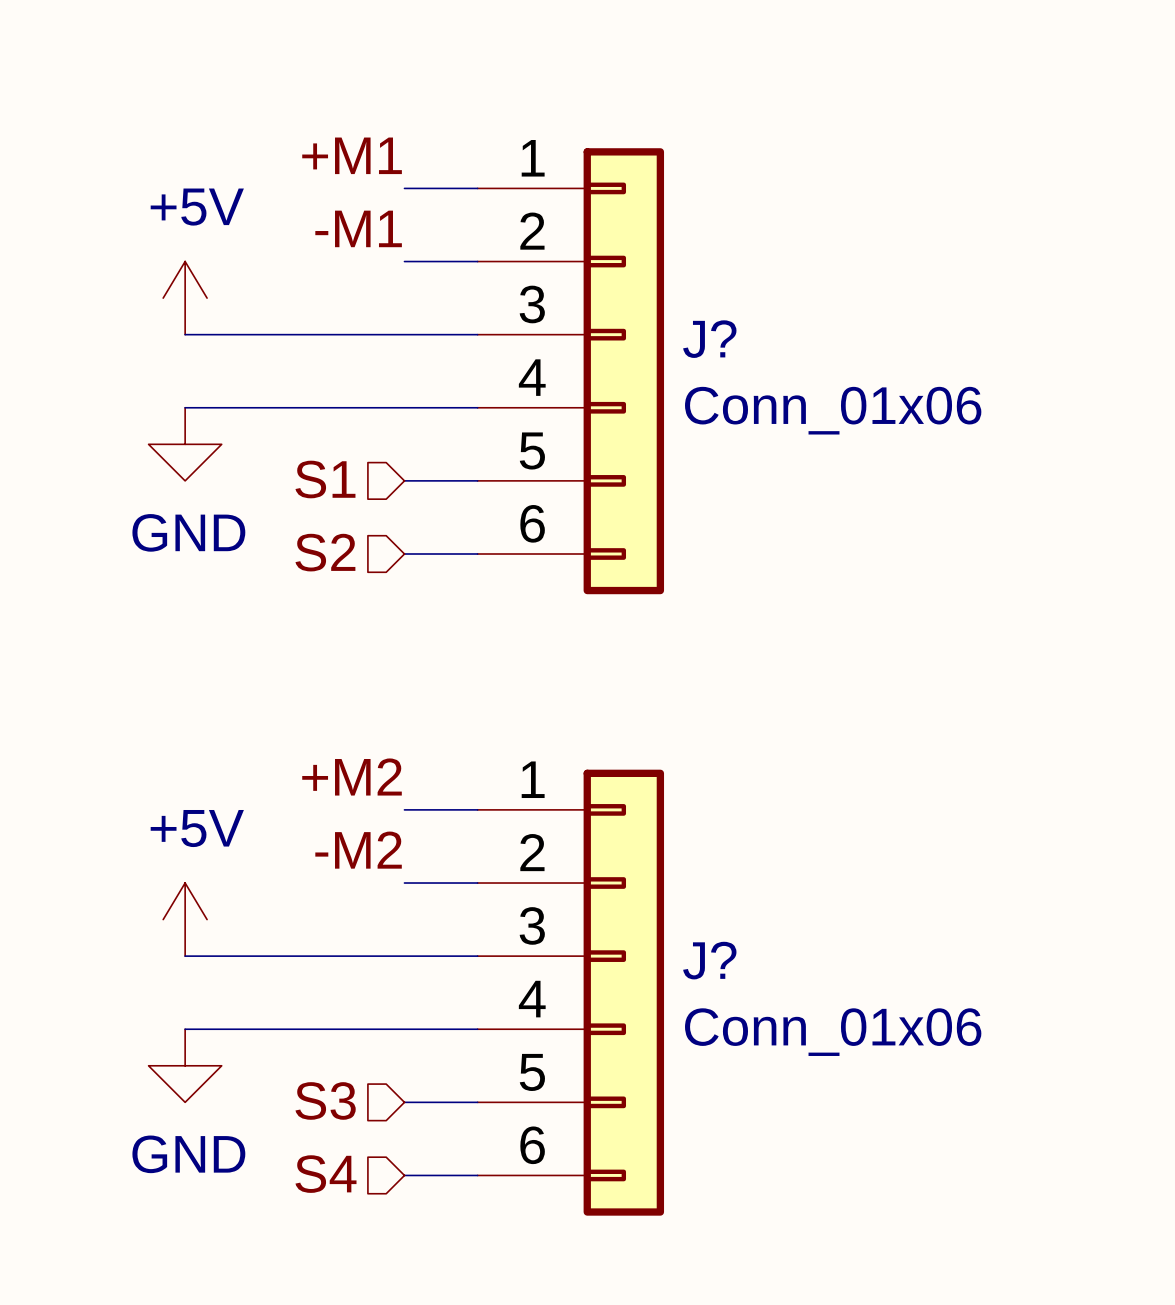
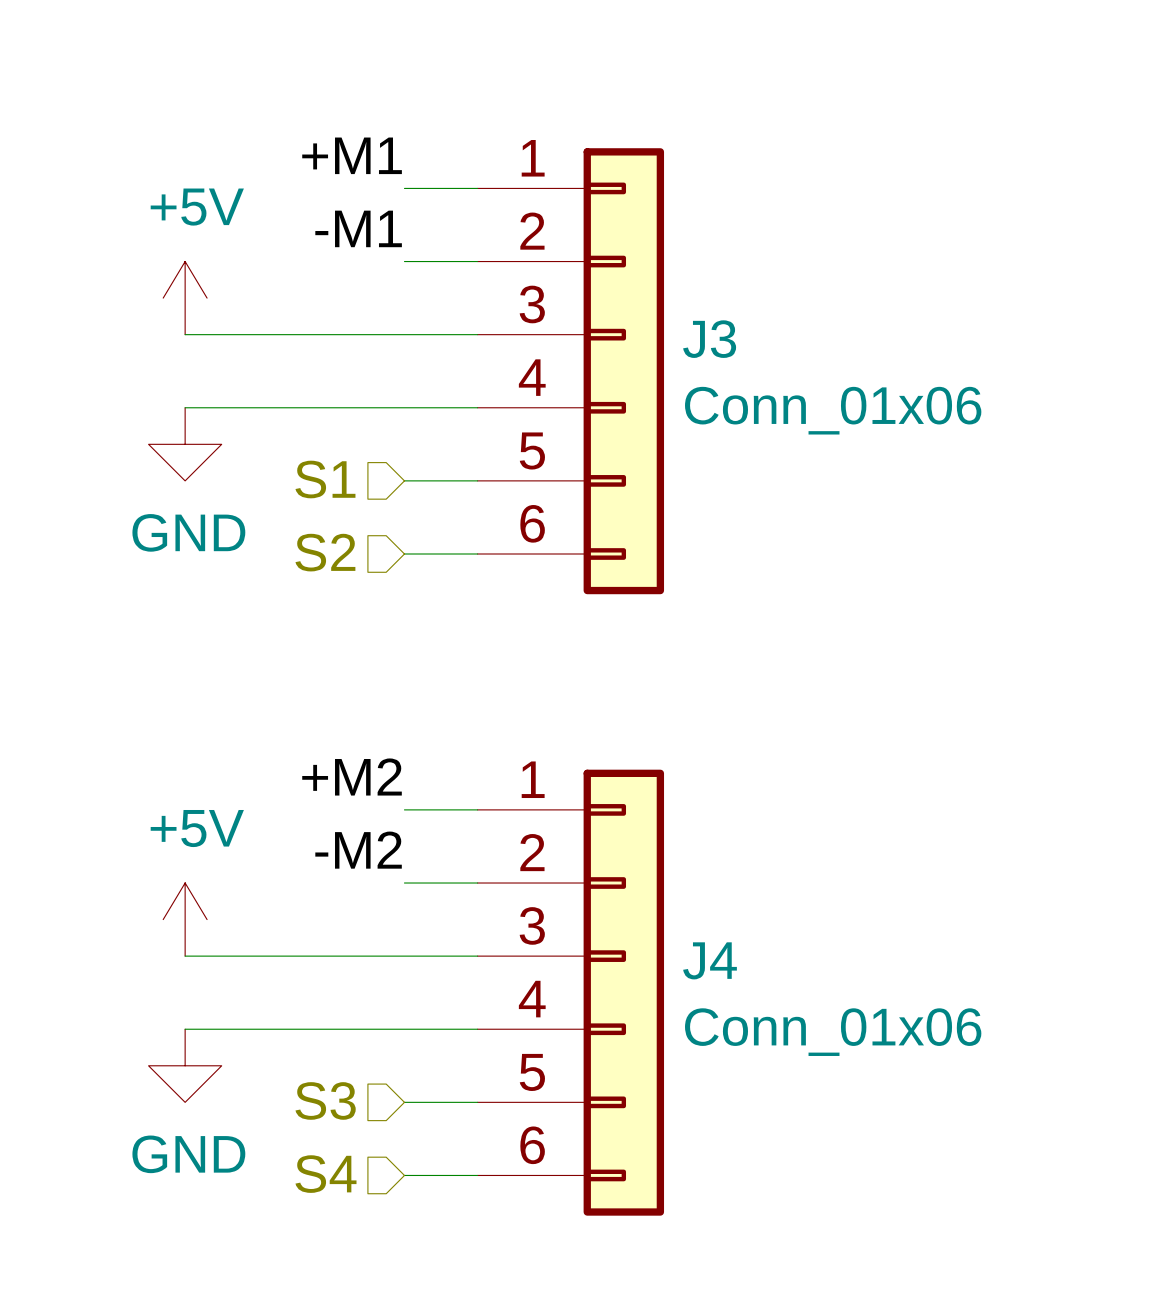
J? name: J? (709, 339) -> J3 (709, 339)
J? name: J? (709, 960) -> J4 (710, 960)

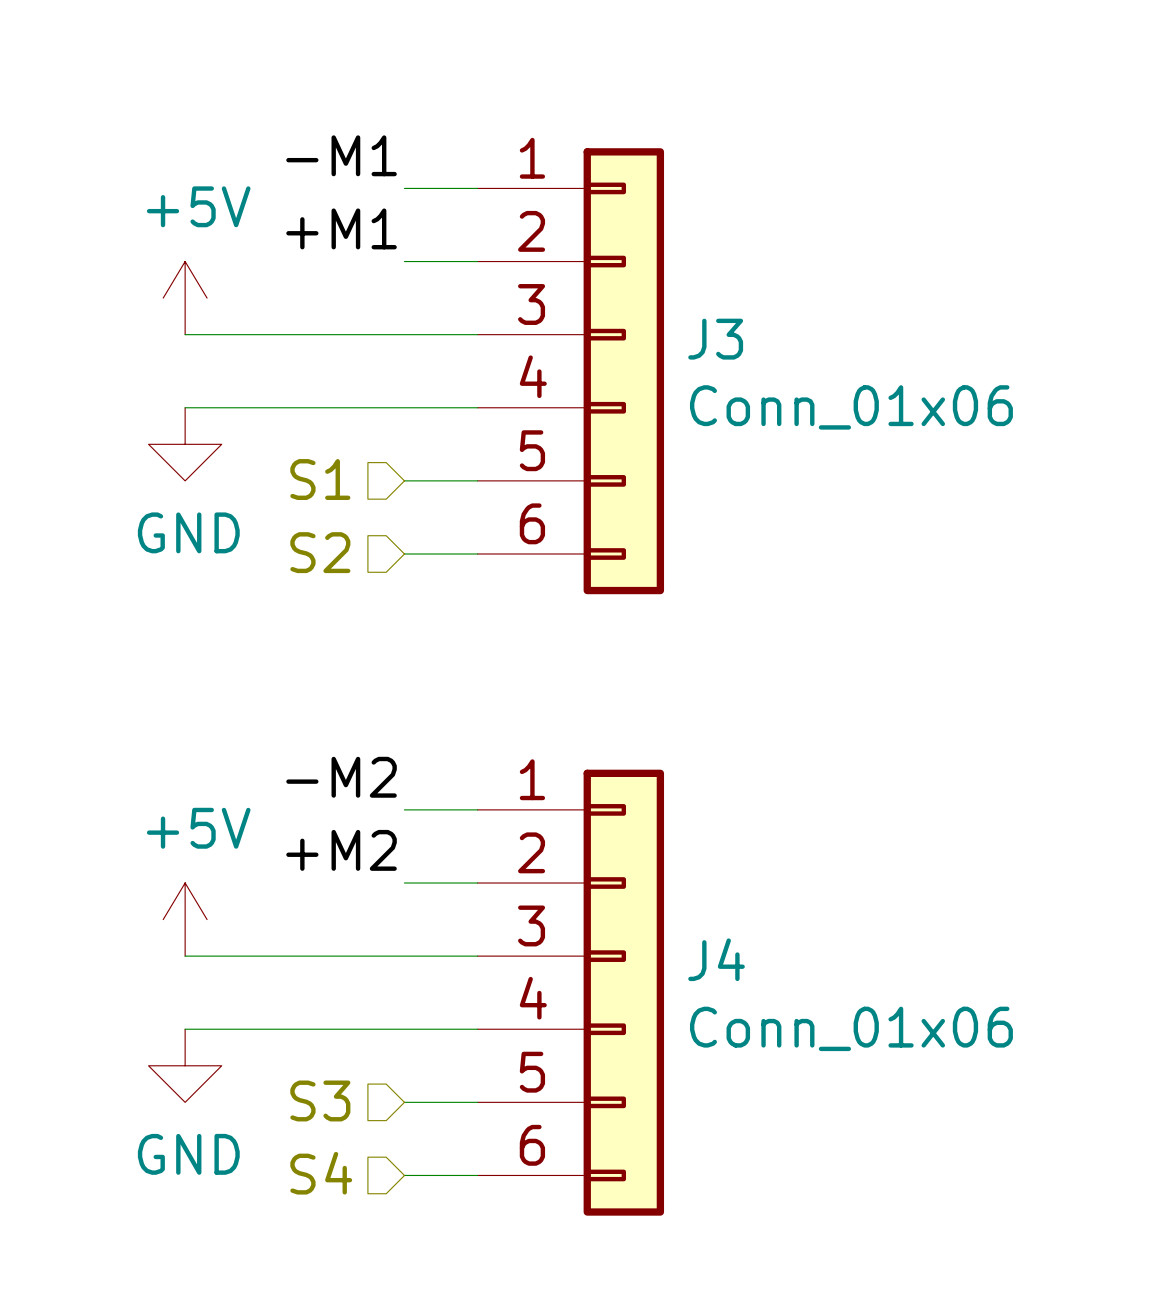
label: +M1 (352, 155) -> -M1 (341, 155)
label: -M1 (358, 228) -> +M1 (341, 228)
label: +M2 (352, 776) -> -M2 (341, 777)
label: -M2 (358, 850) -> +M2 (341, 850)

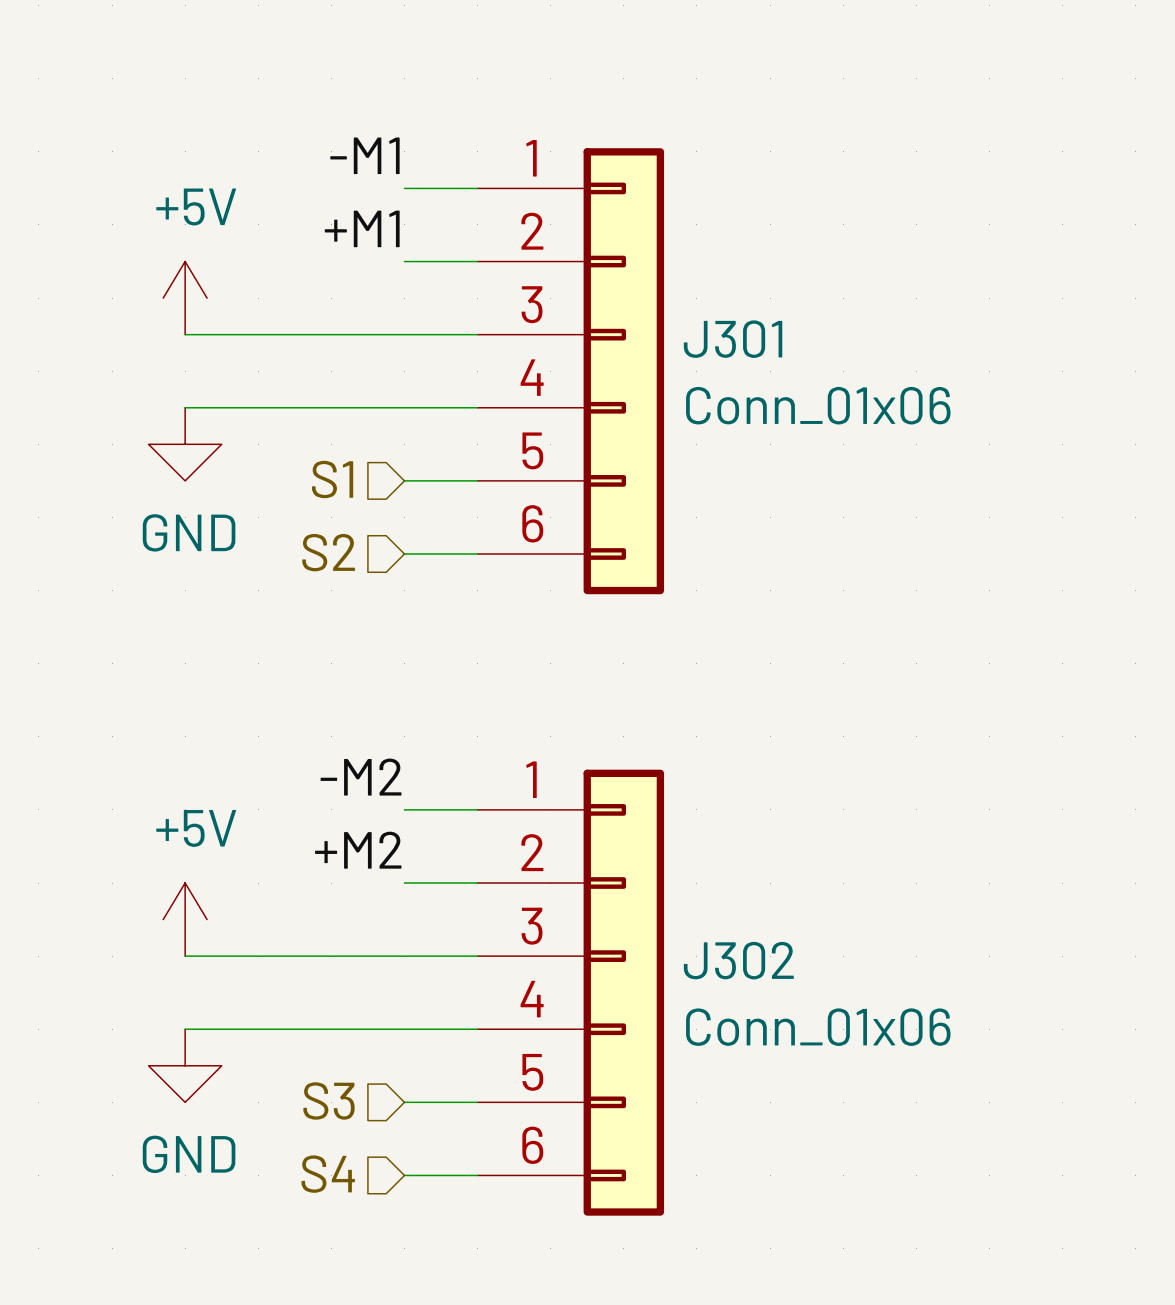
J3 name: J3 (715, 339) -> J301 (733, 339)
J4 name: J4 (716, 959) -> J302 (738, 960)

